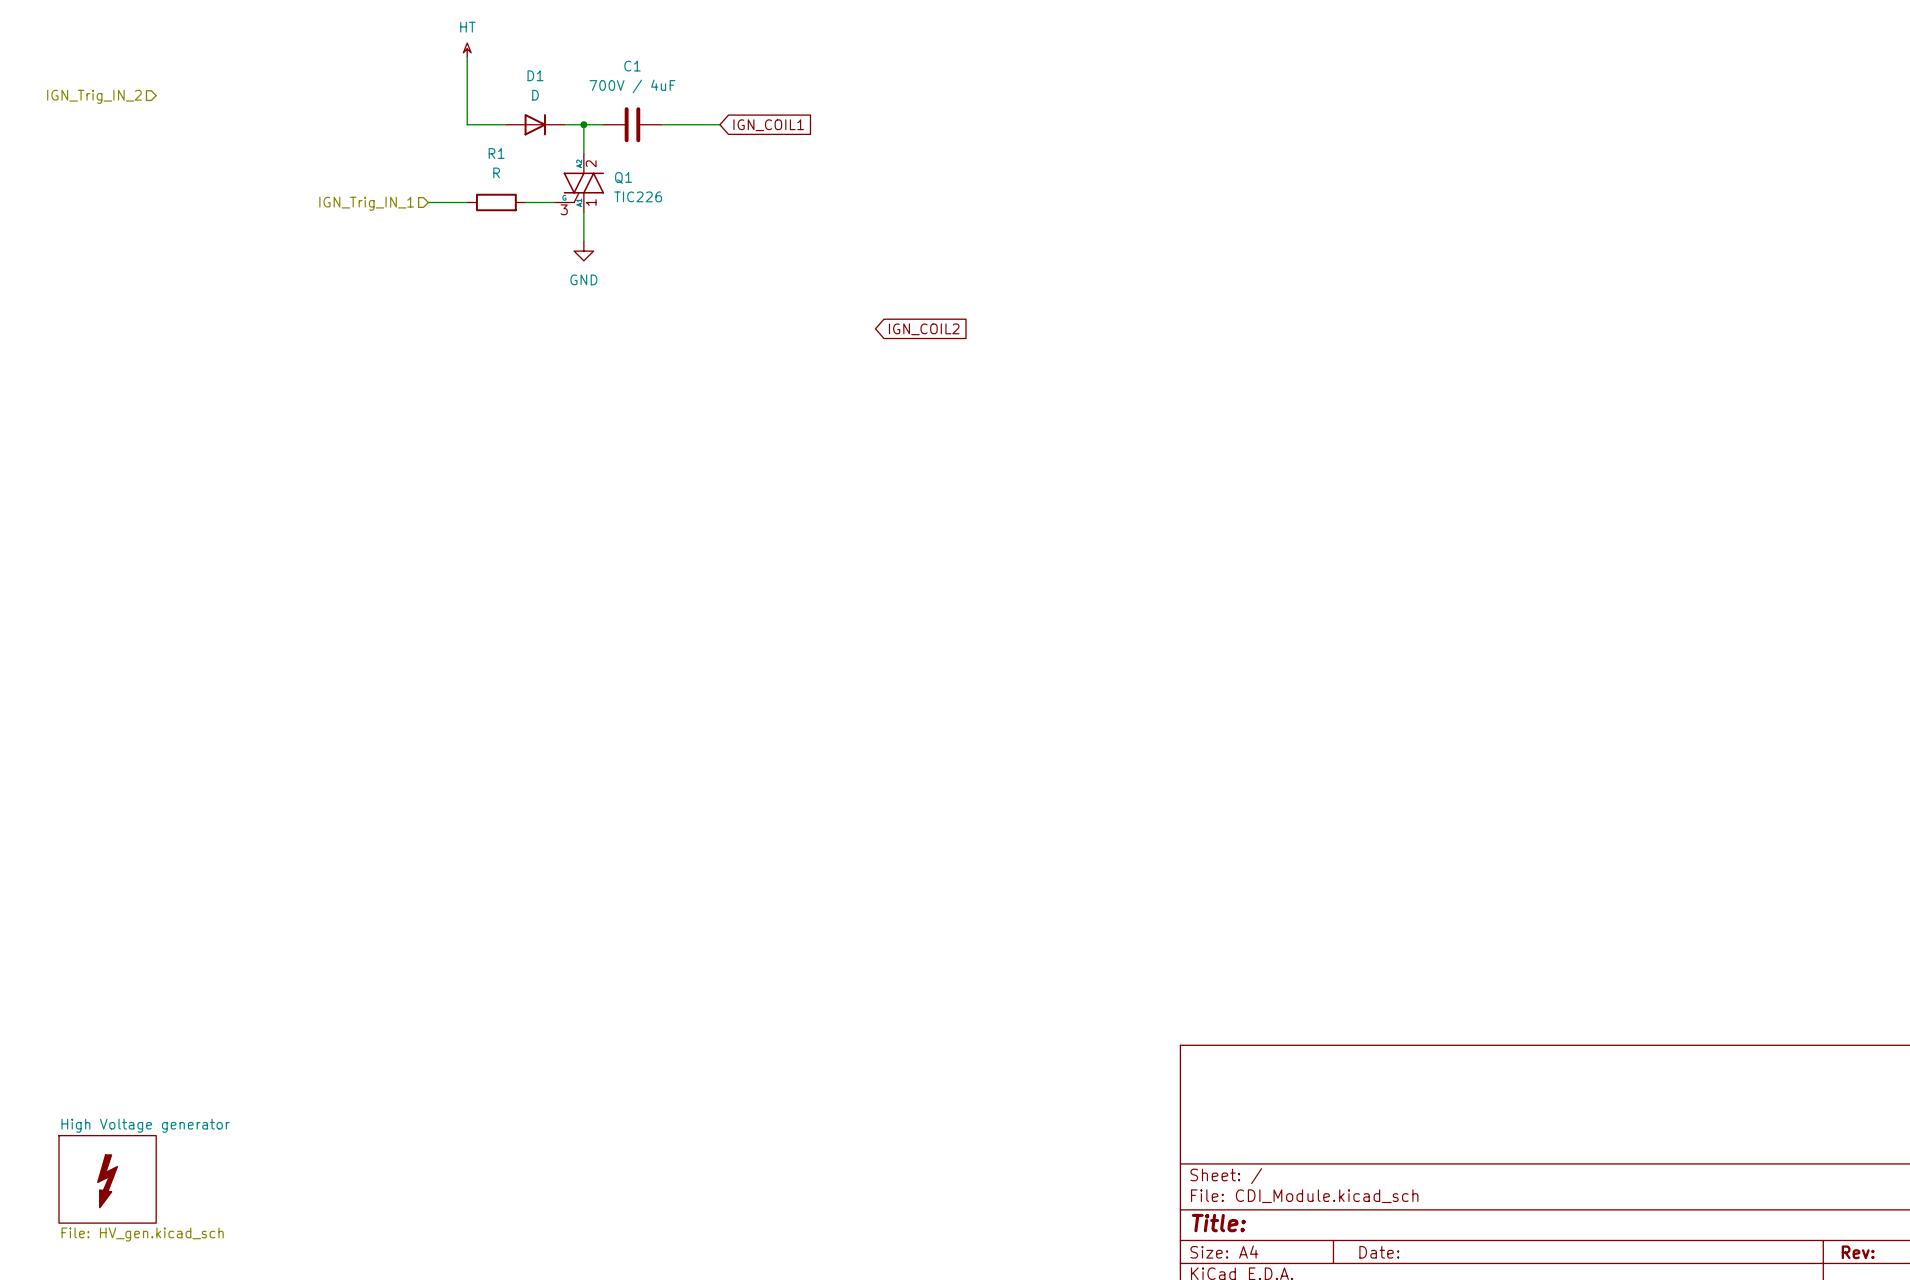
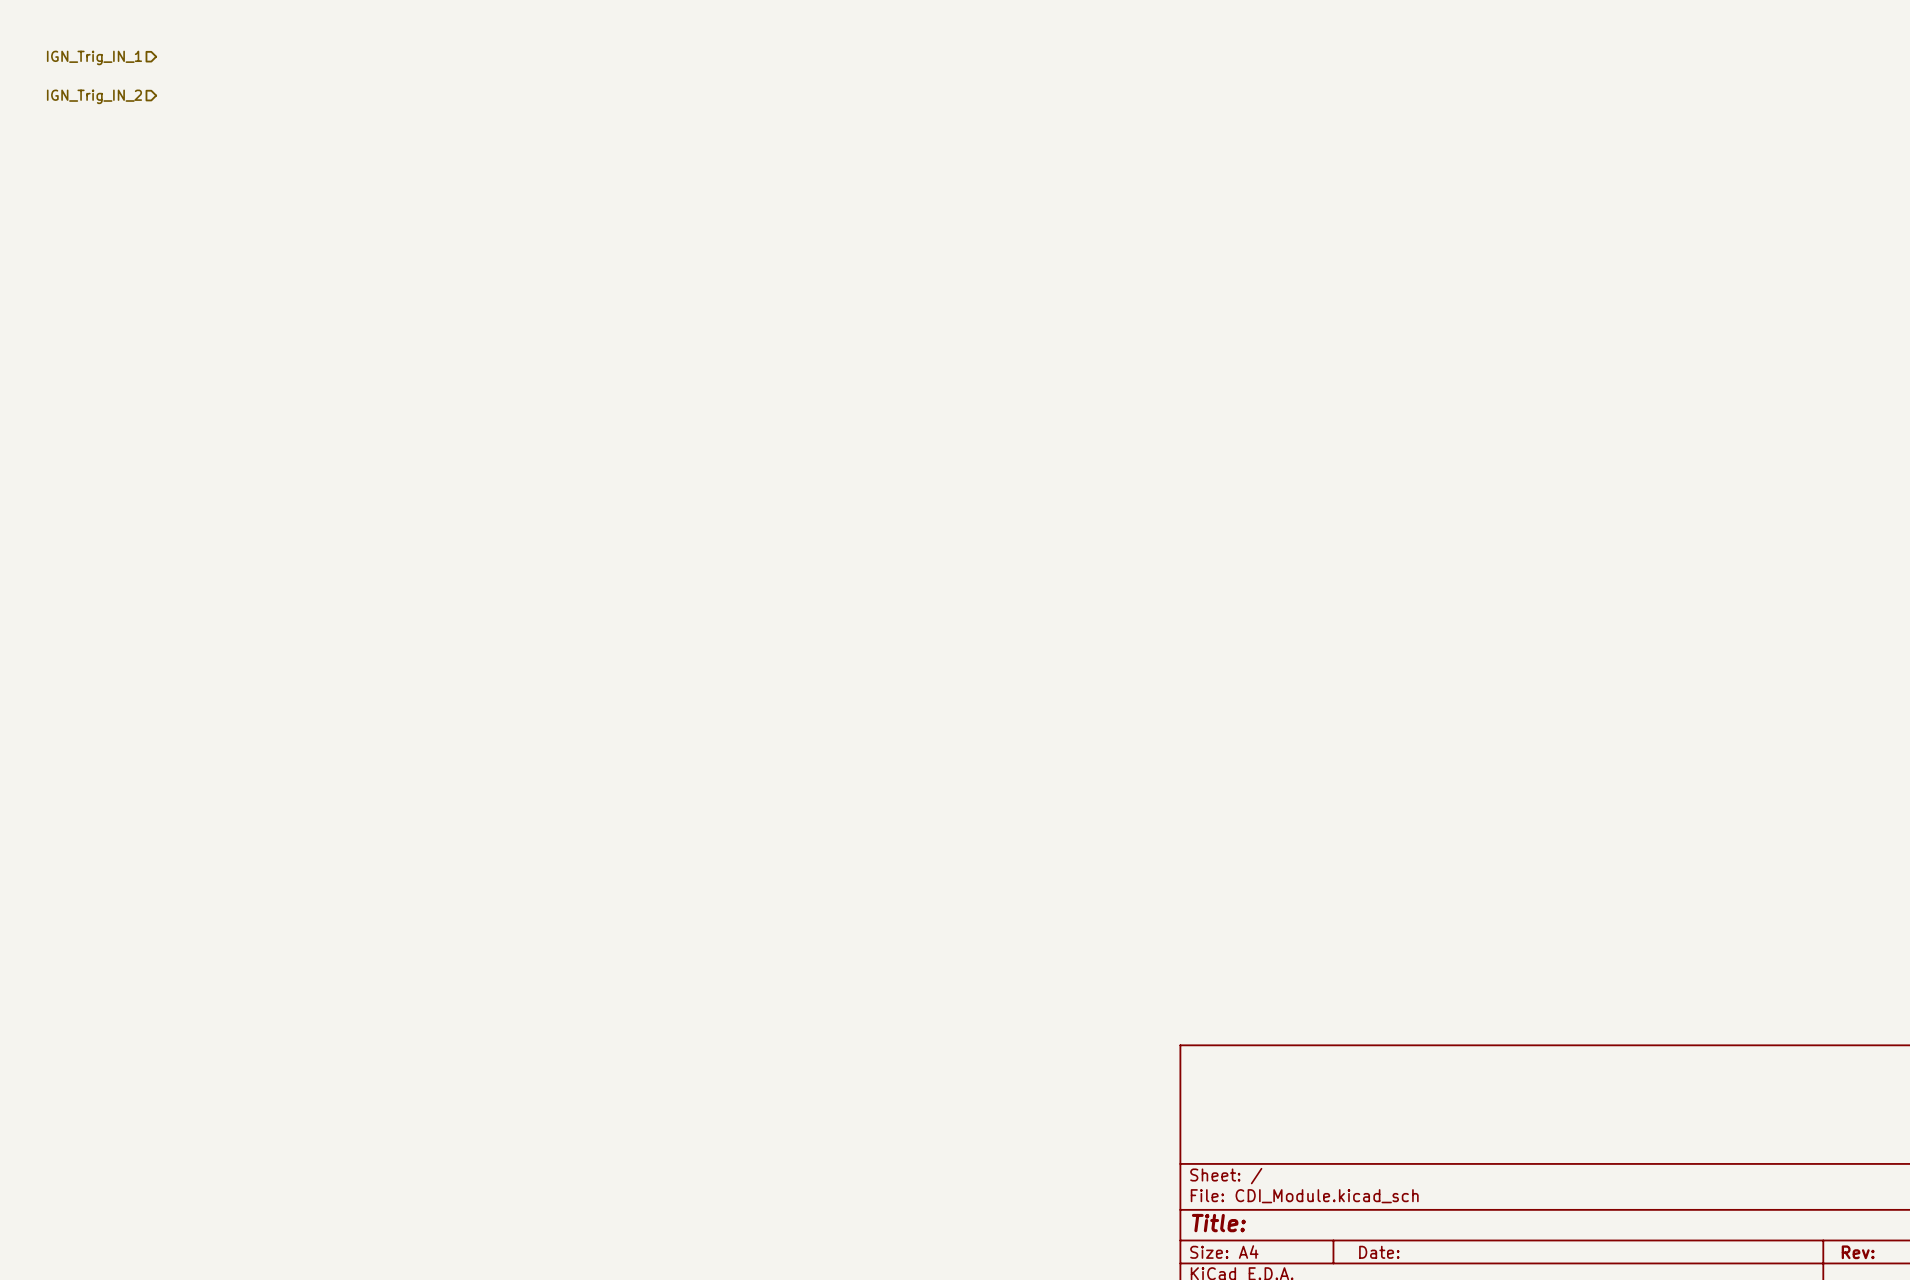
power symbol: HT (467, 49) -> none
wire: (467, 56) (467, 124) (506, 124) -> none
hierarchical label: none -> IGN_Trig_IN_1 (94, 57)
D1: D (535, 124) -> none
wire: (564, 124) (603, 124) -> none
wire: (583, 124) (583, 153) -> none
junction: (583, 124) -> none
C1: 700V / 4uF (632, 124) -> none
wire: (661, 124) (719, 124) -> none
global label: IGN_COIL1 (768, 125) -> none
Q1: TIC226 (579, 183) -> none
wire: (428, 202) (467, 202) -> none
R1: R (496, 202) -> none
wire: (525, 202) (554, 202) -> none
hierarchical label: IGN_Trig_IN_1 (366, 203) -> none
wire: (583, 212) (583, 241) -> none
power symbol: GND (583, 251) -> none
global label: IGN_COIL2 (924, 329) -> none
sheet High Voltage generator: File: HV_gen.kicad_sch (107, 1179) -> none
power symbol: (107, 1181) -> none

